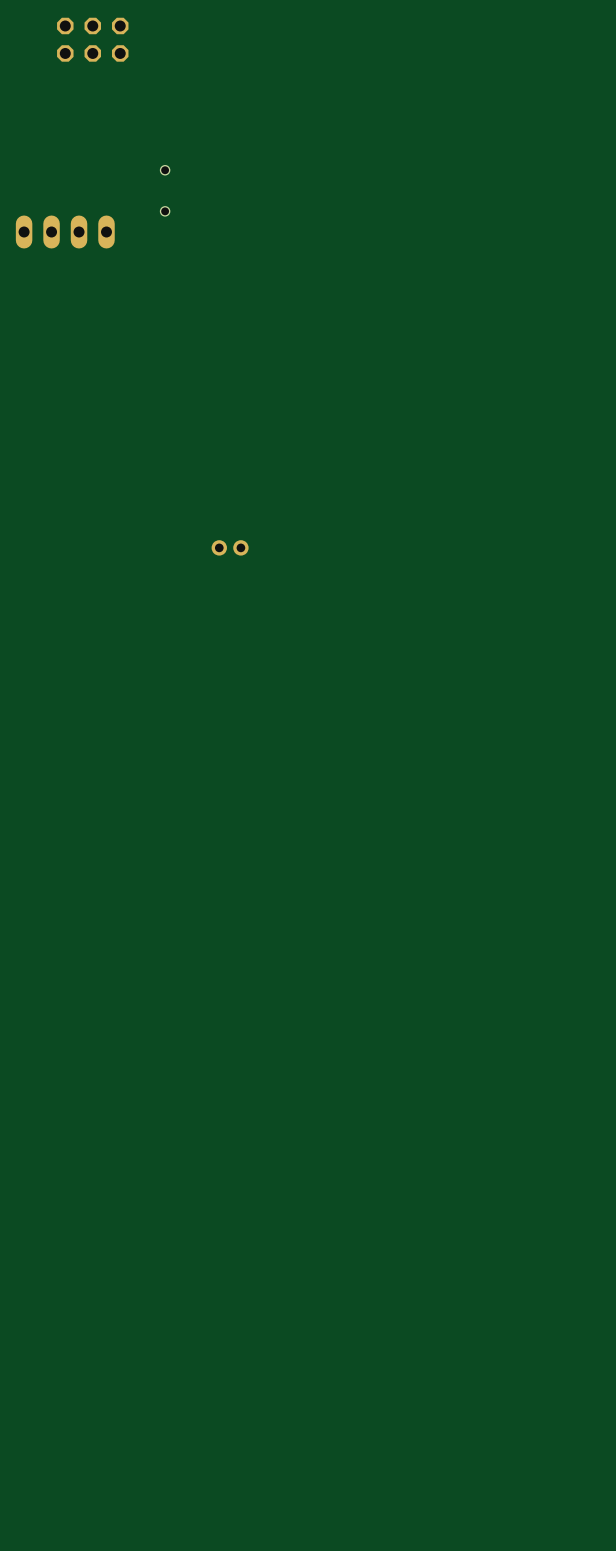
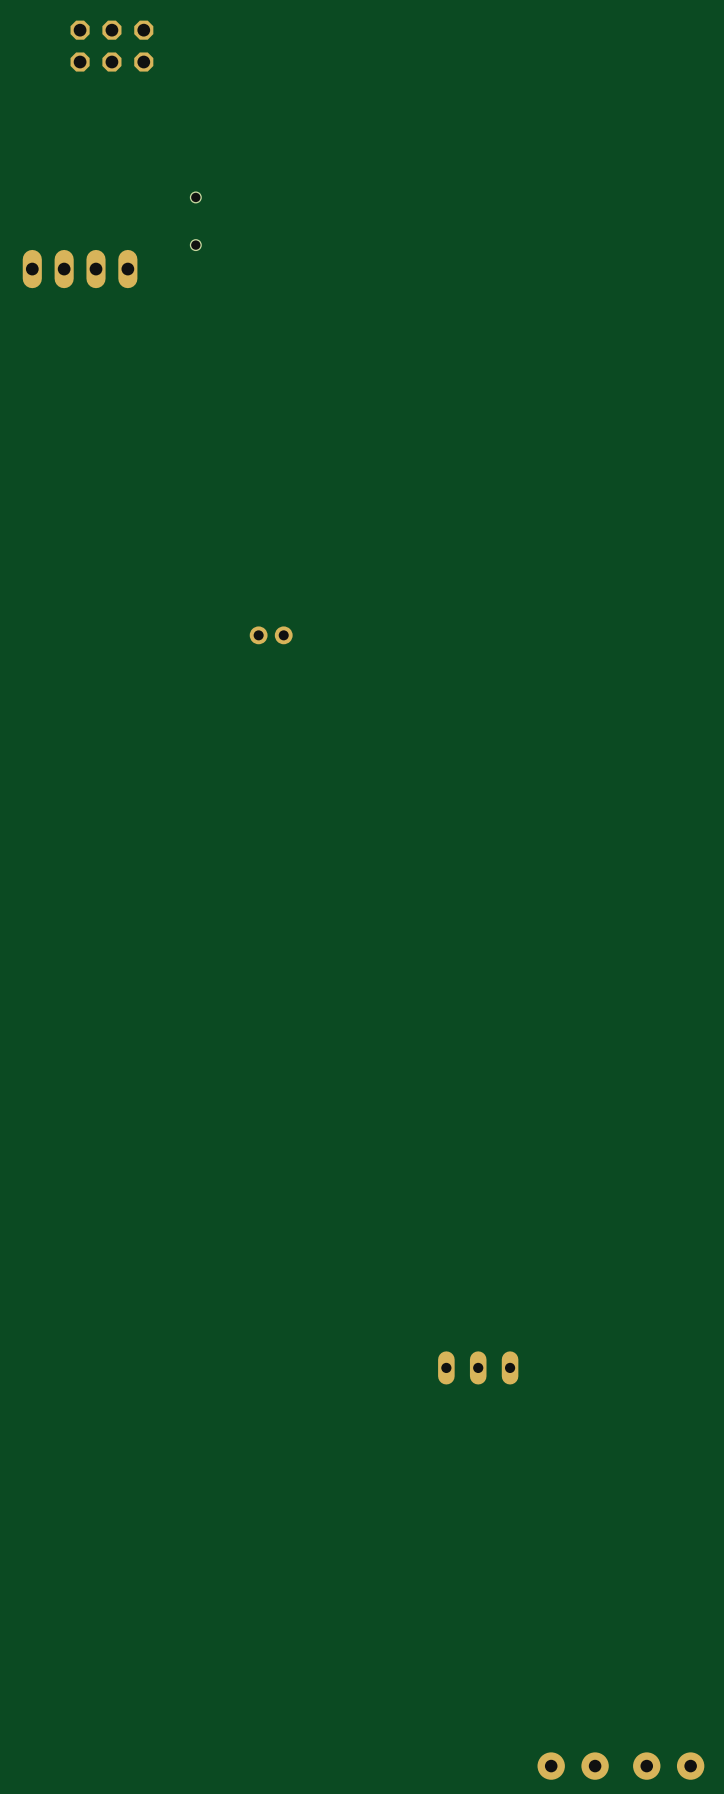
part: none -> (478, 1367)
part: none -> (573, 1766)
part: none -> (668, 1766)

